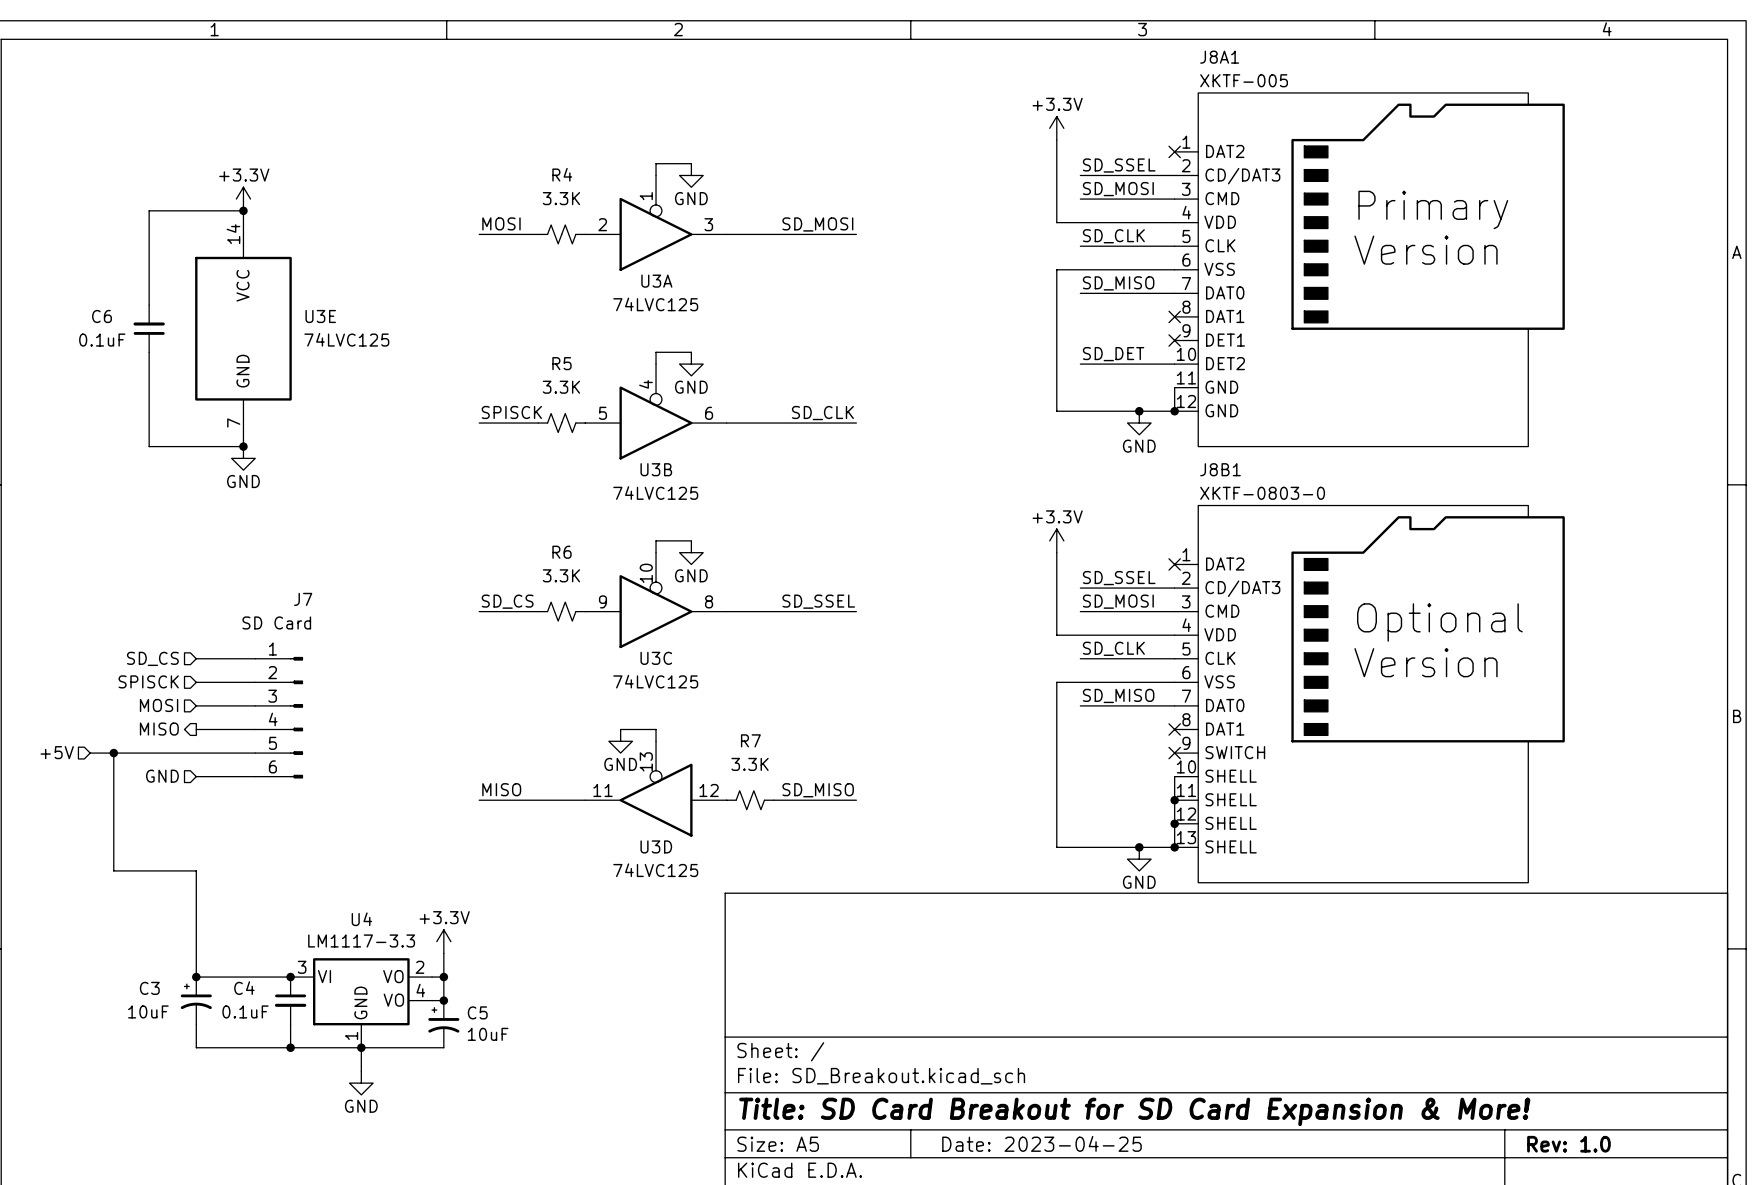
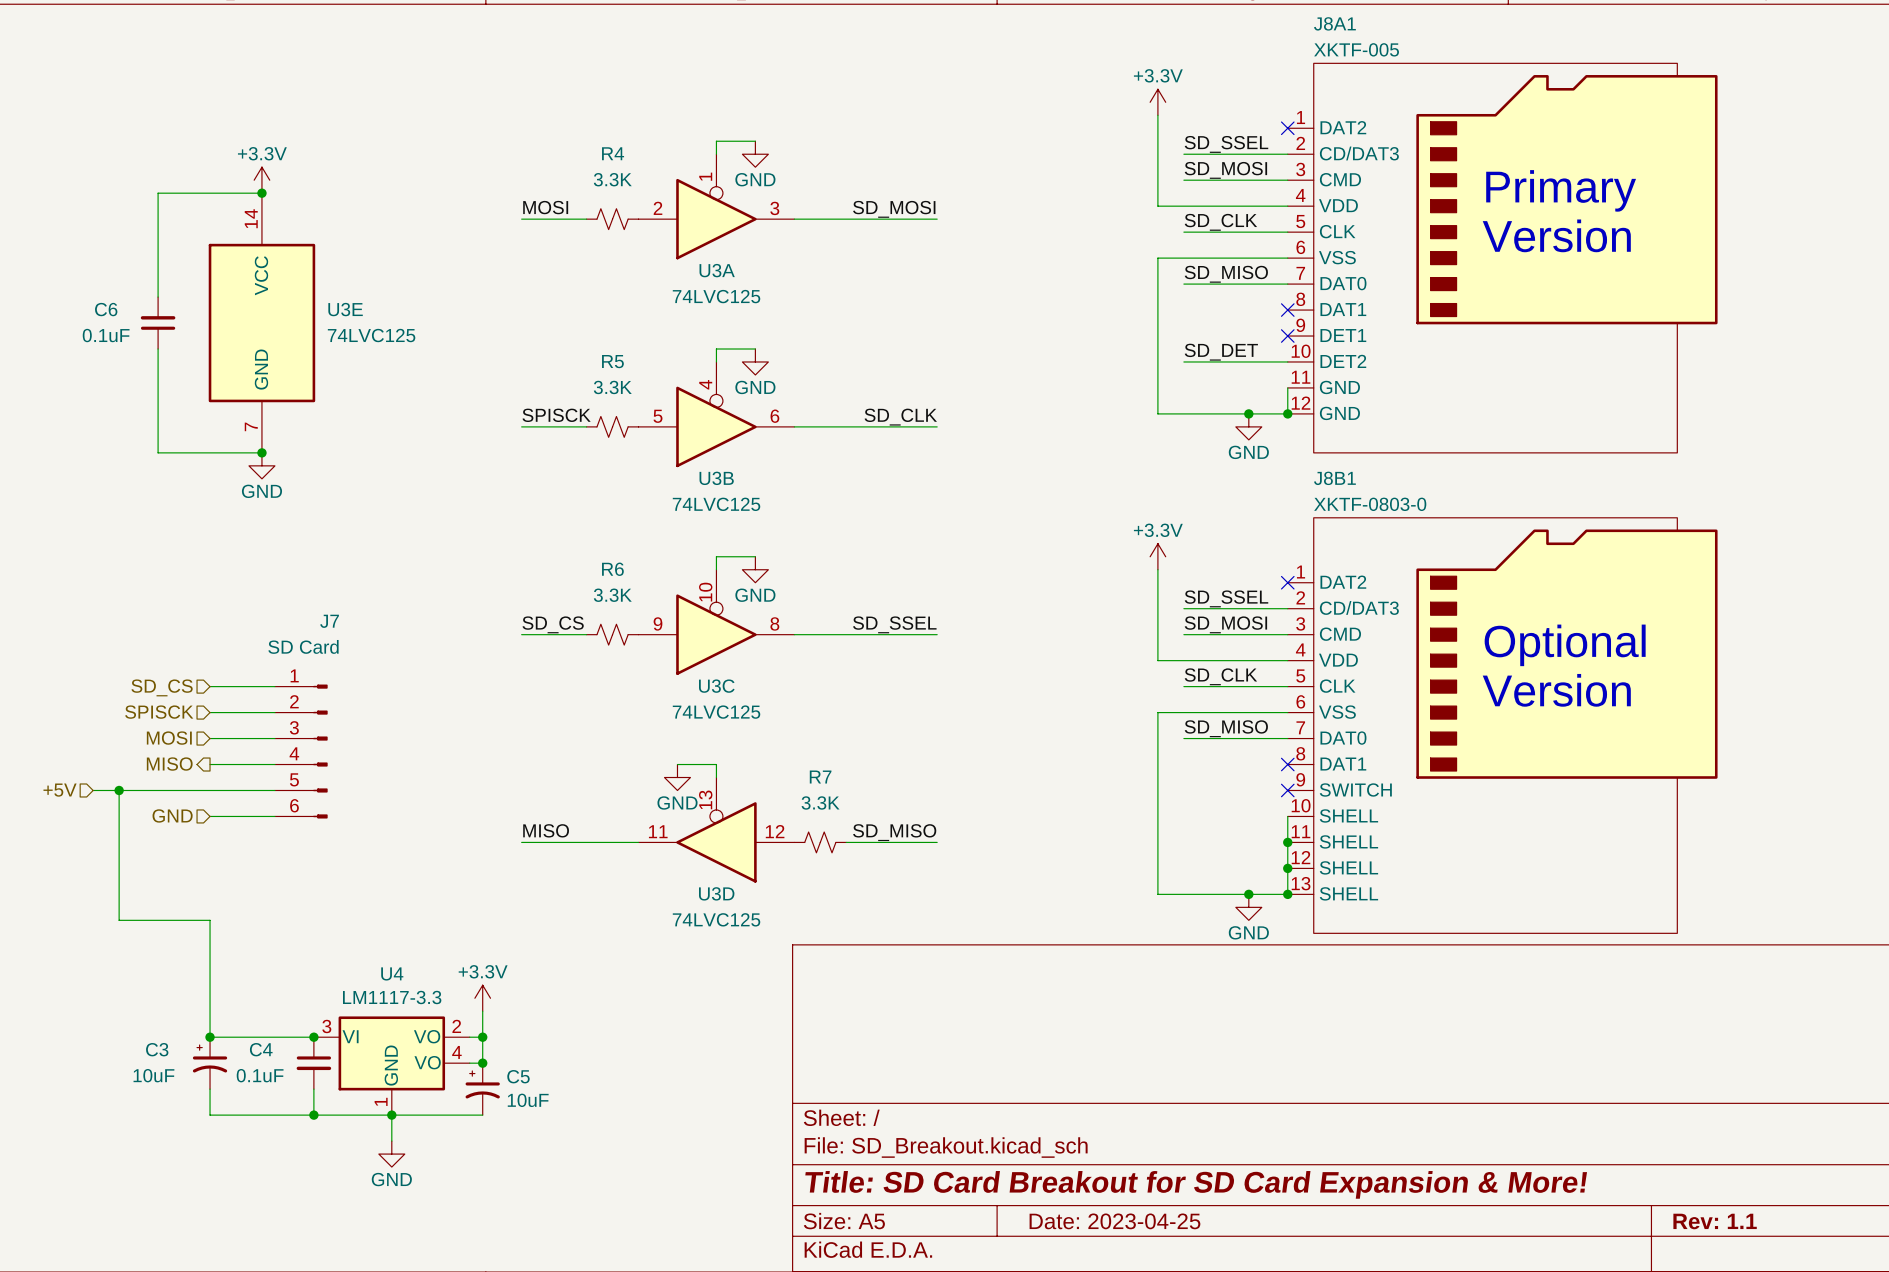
title block: Rev: 1.0 (1568, 1144) -> Rev: 1.1 (1715, 1221)

